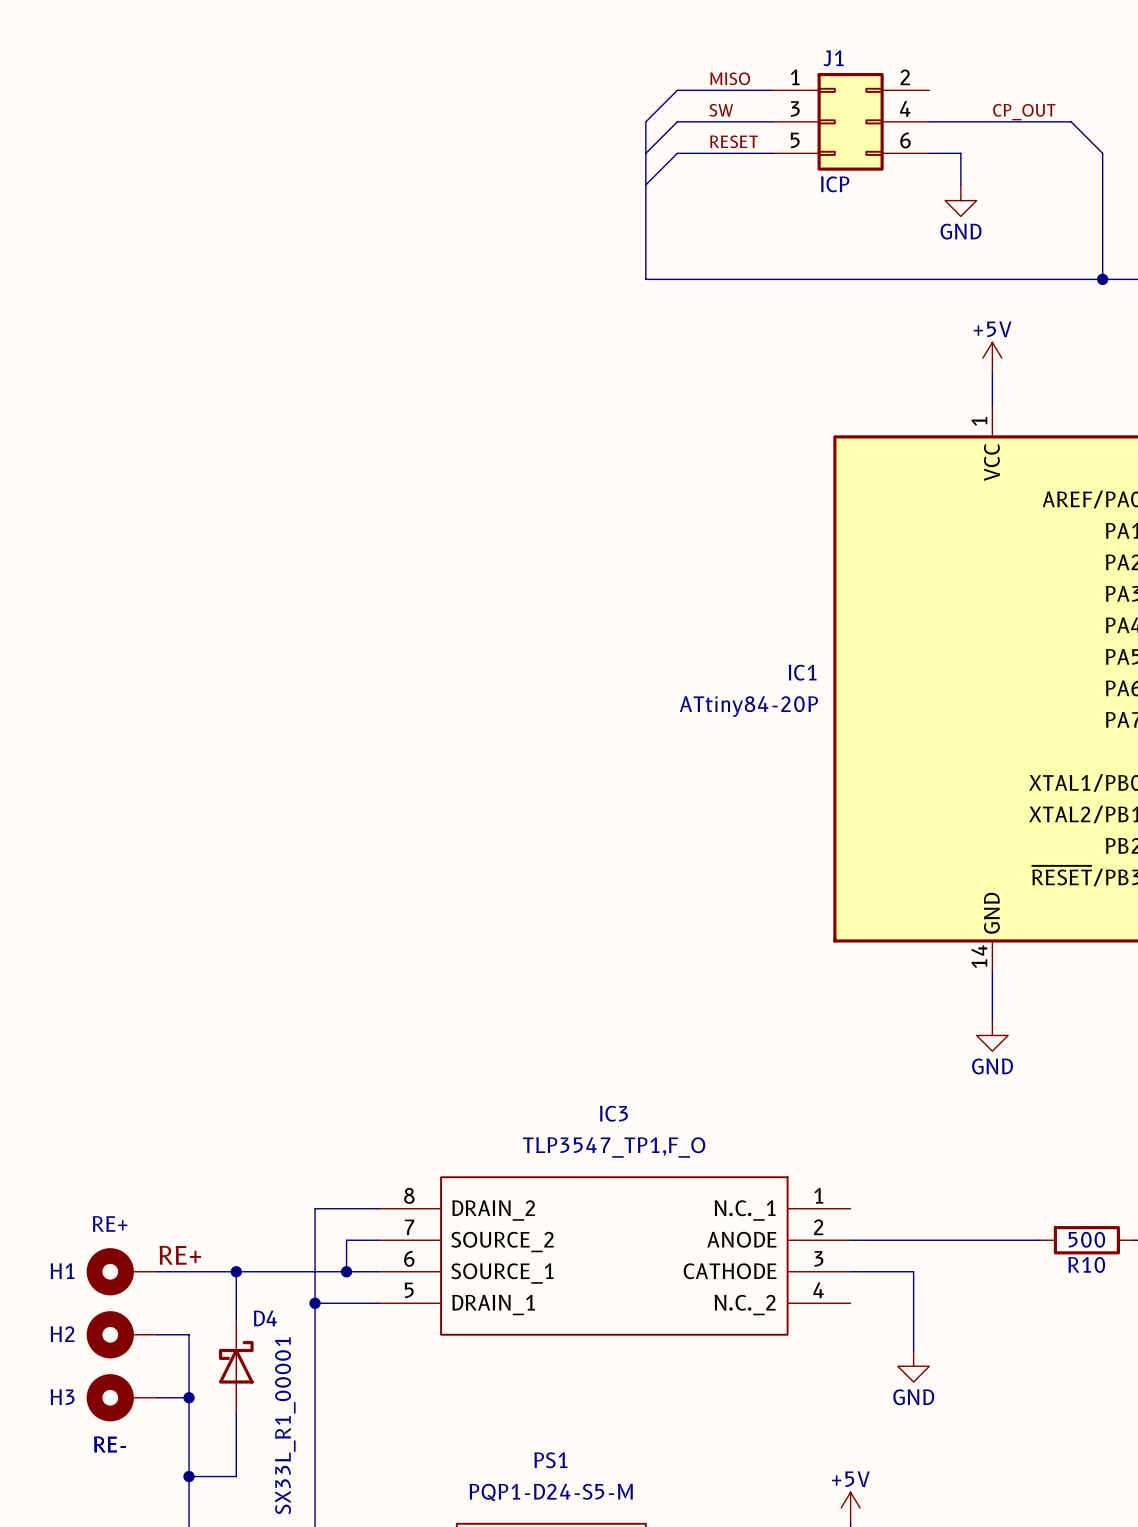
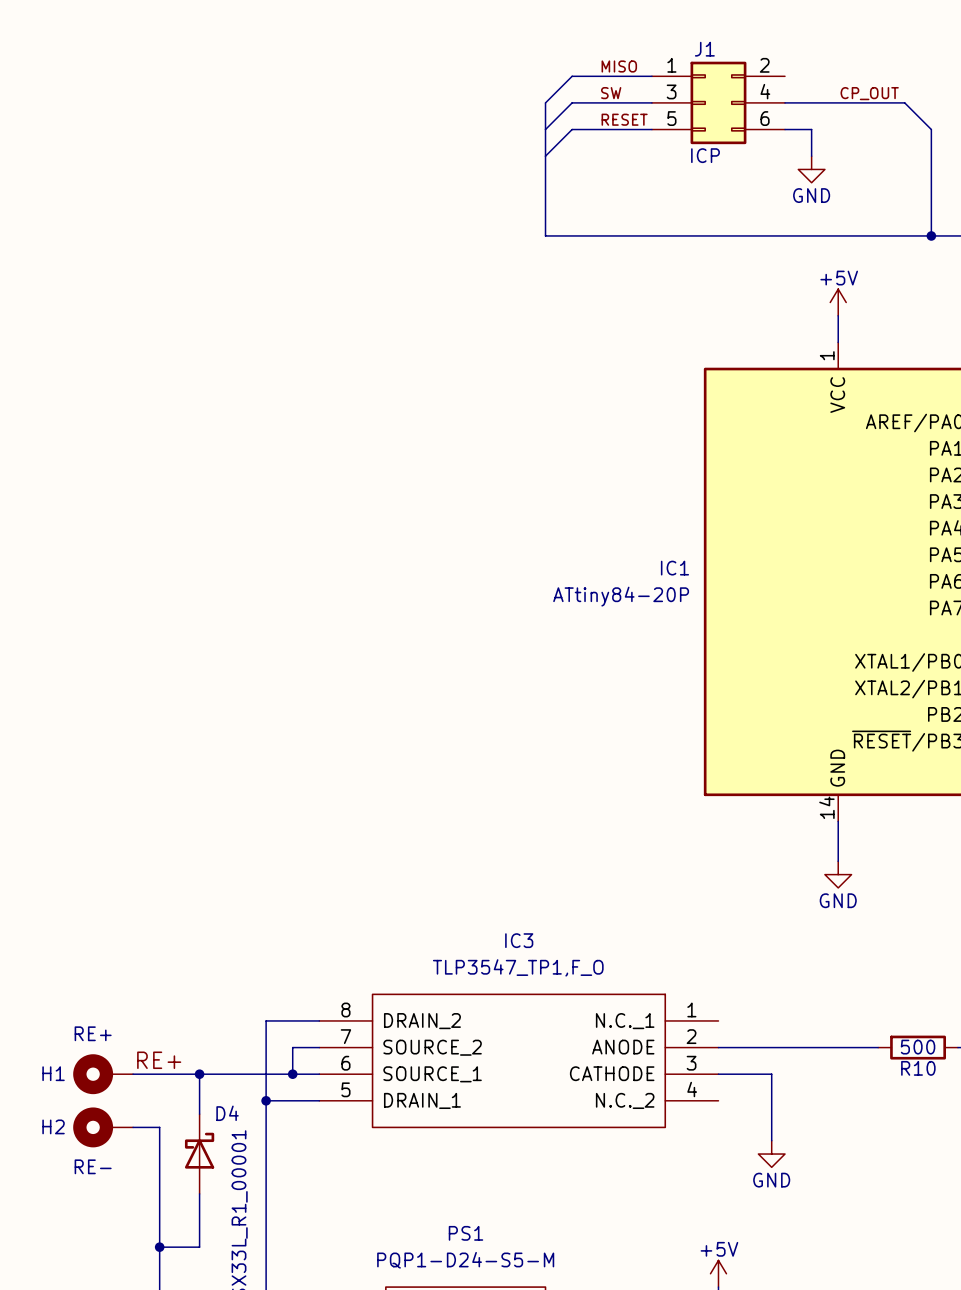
H3: RE- (122, 1397) -> none
wire: (157, 1397) (189, 1397) -> none
junction: (189, 1397) -> none
H2 value position: RE- (110, 1444) -> RE- (93, 1166)

